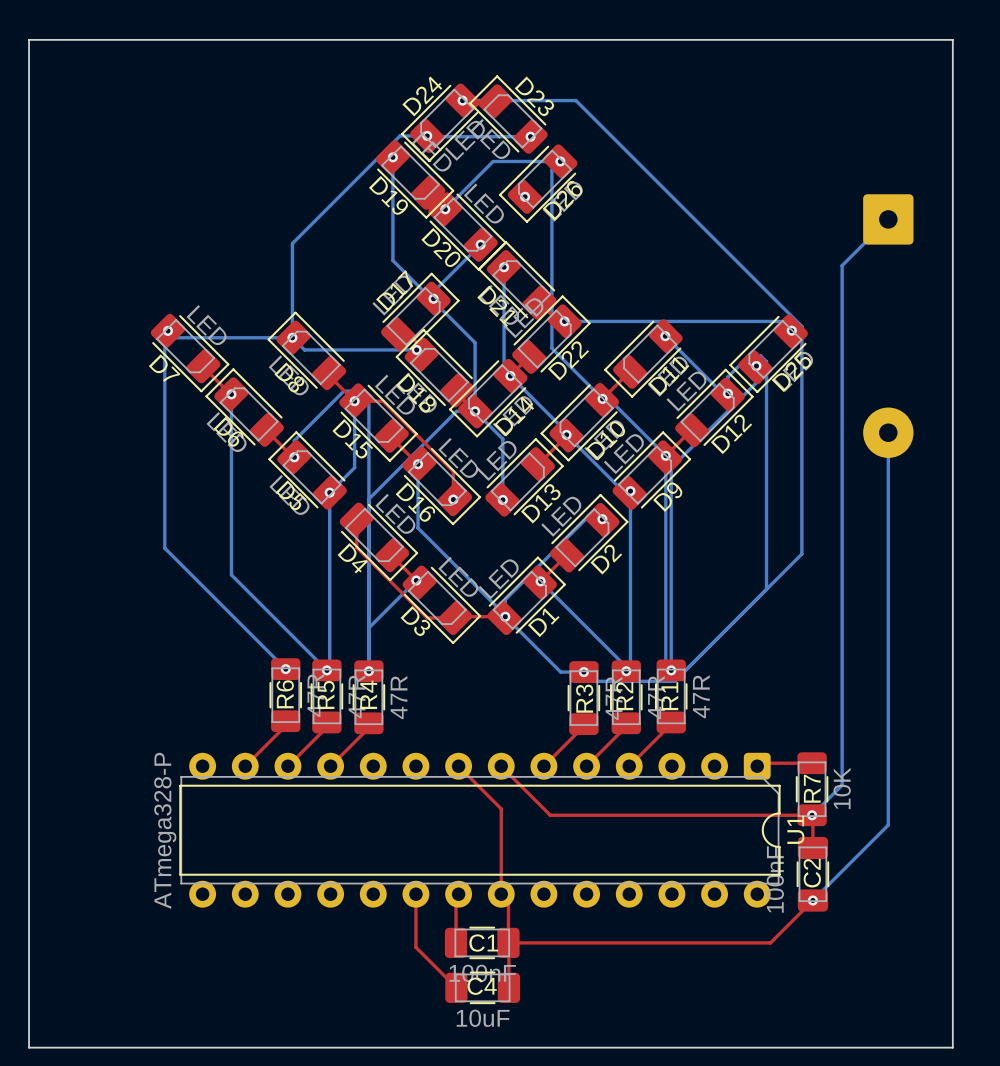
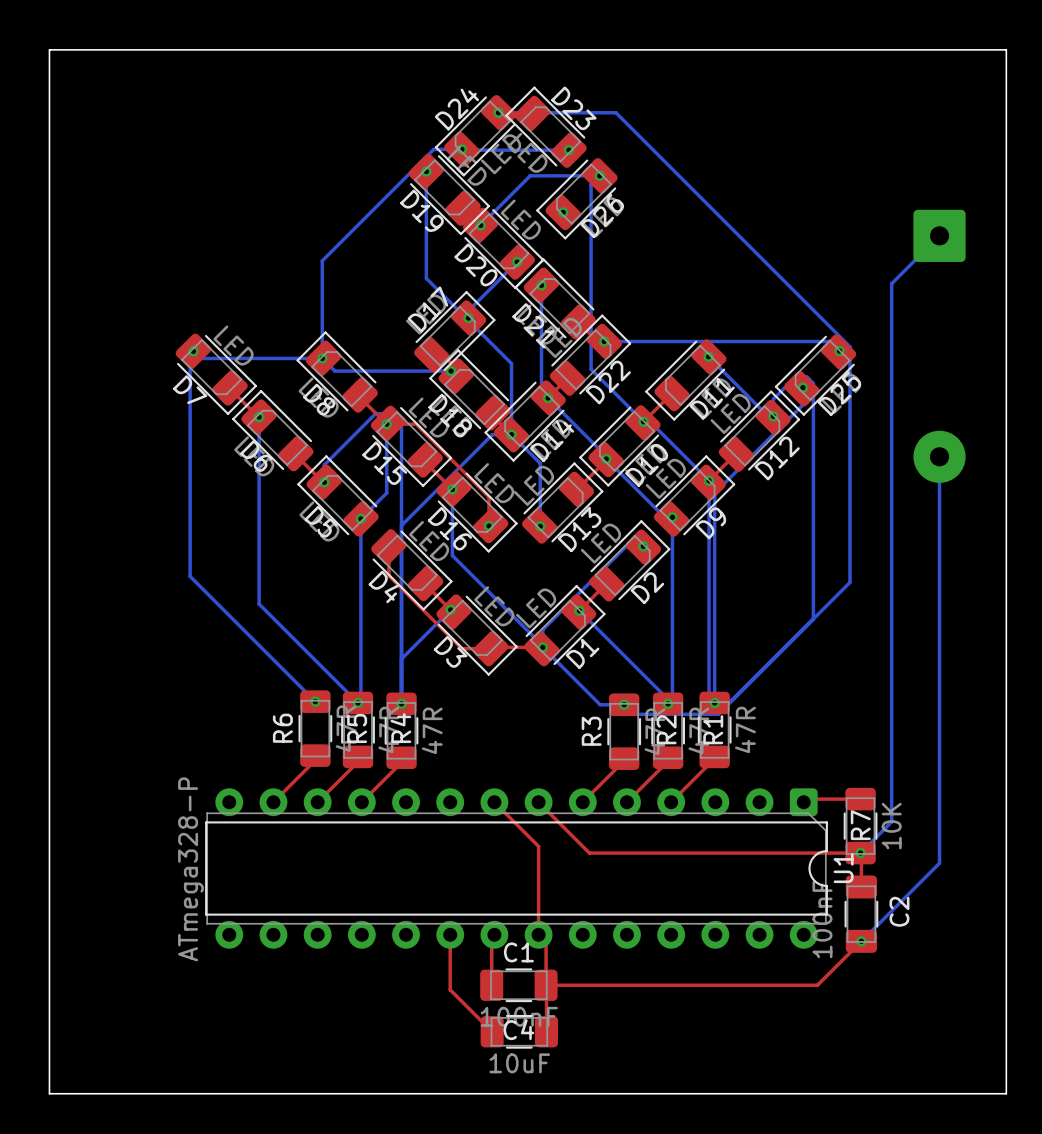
R6 name position: R6 (285, 694) -> R6 (282, 728)
R3 name position: R3 (584, 698) -> R3 (591, 731)
C2 name position: C2 (812, 873) -> C2 (899, 911)
C1 name position: C1 (483, 943) -> C1 (518, 952)

